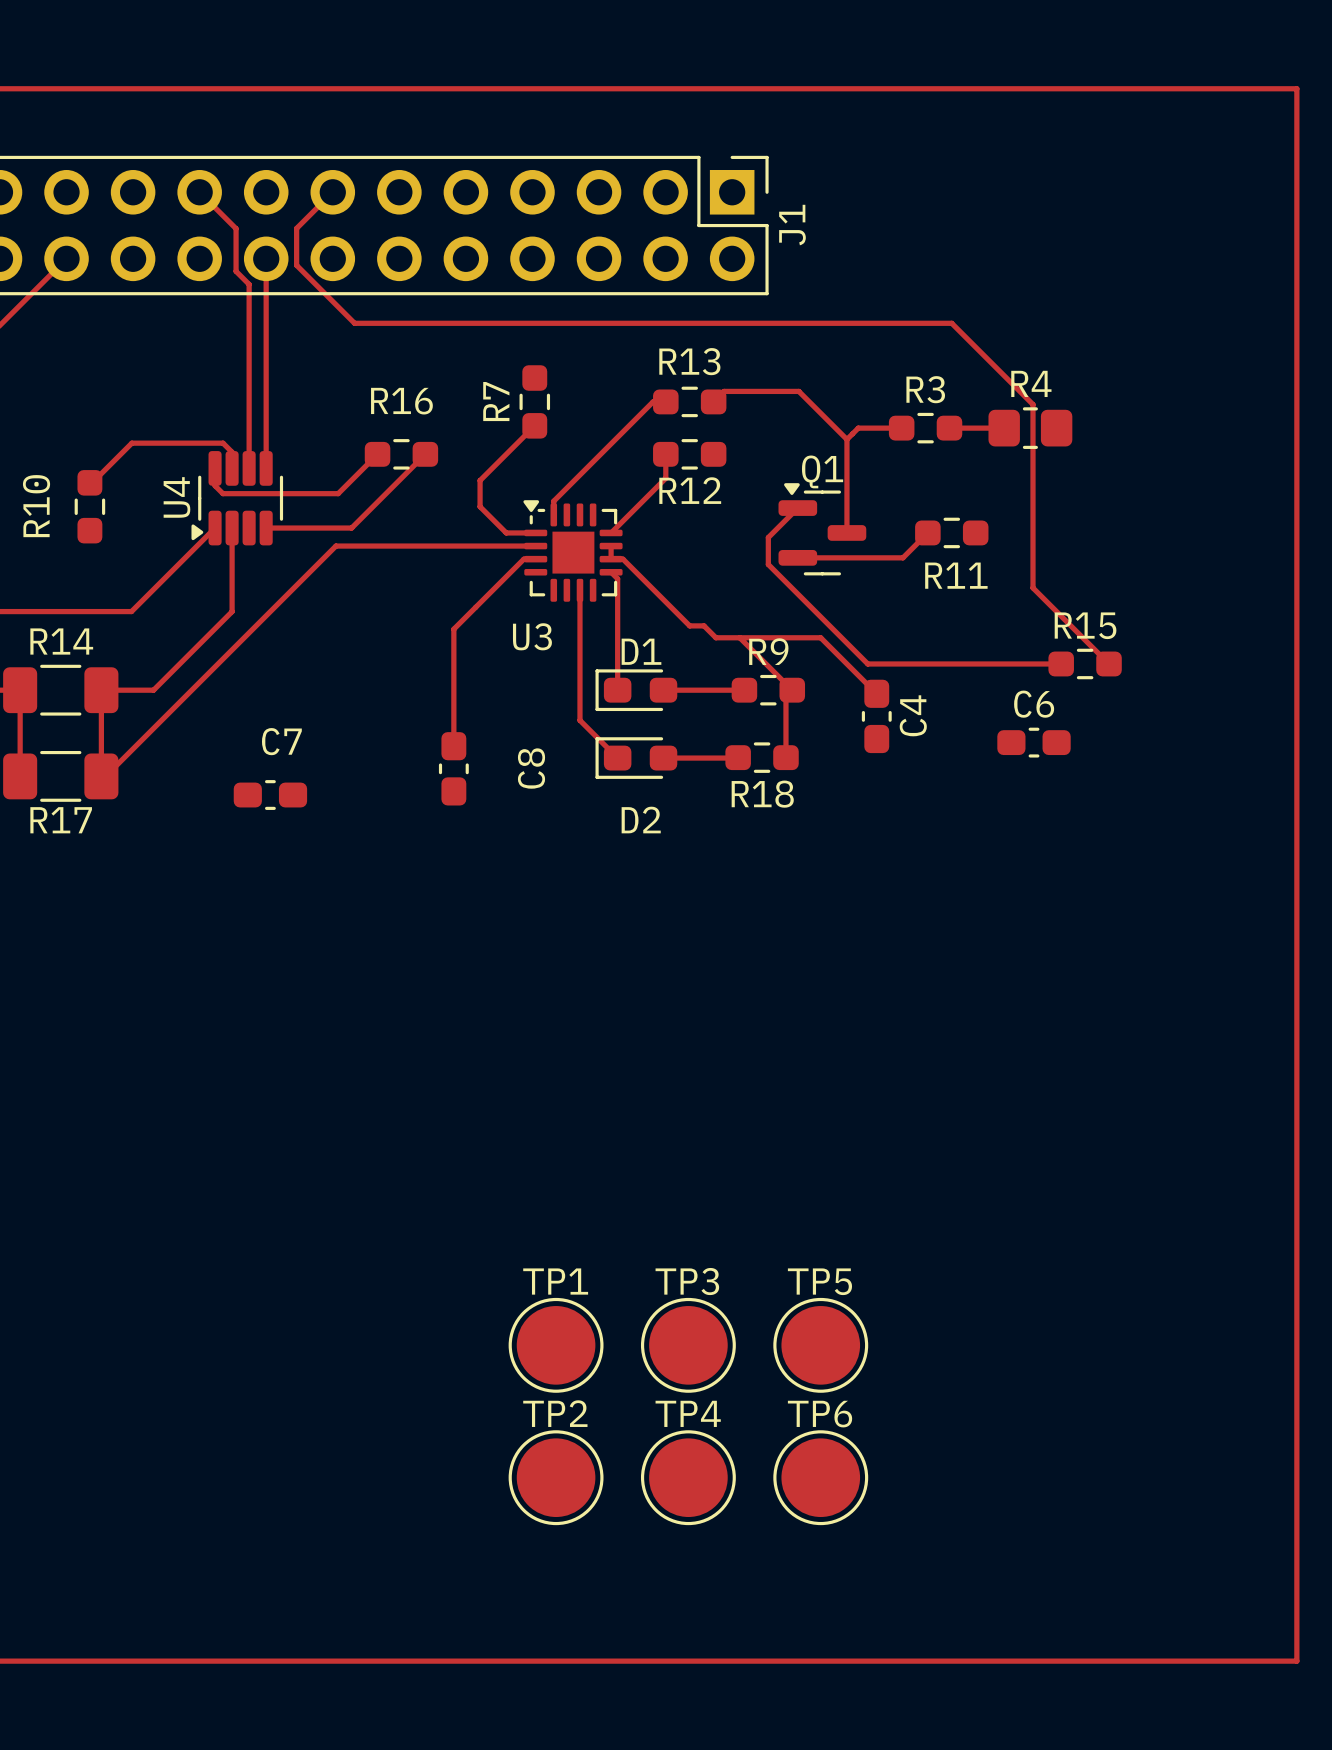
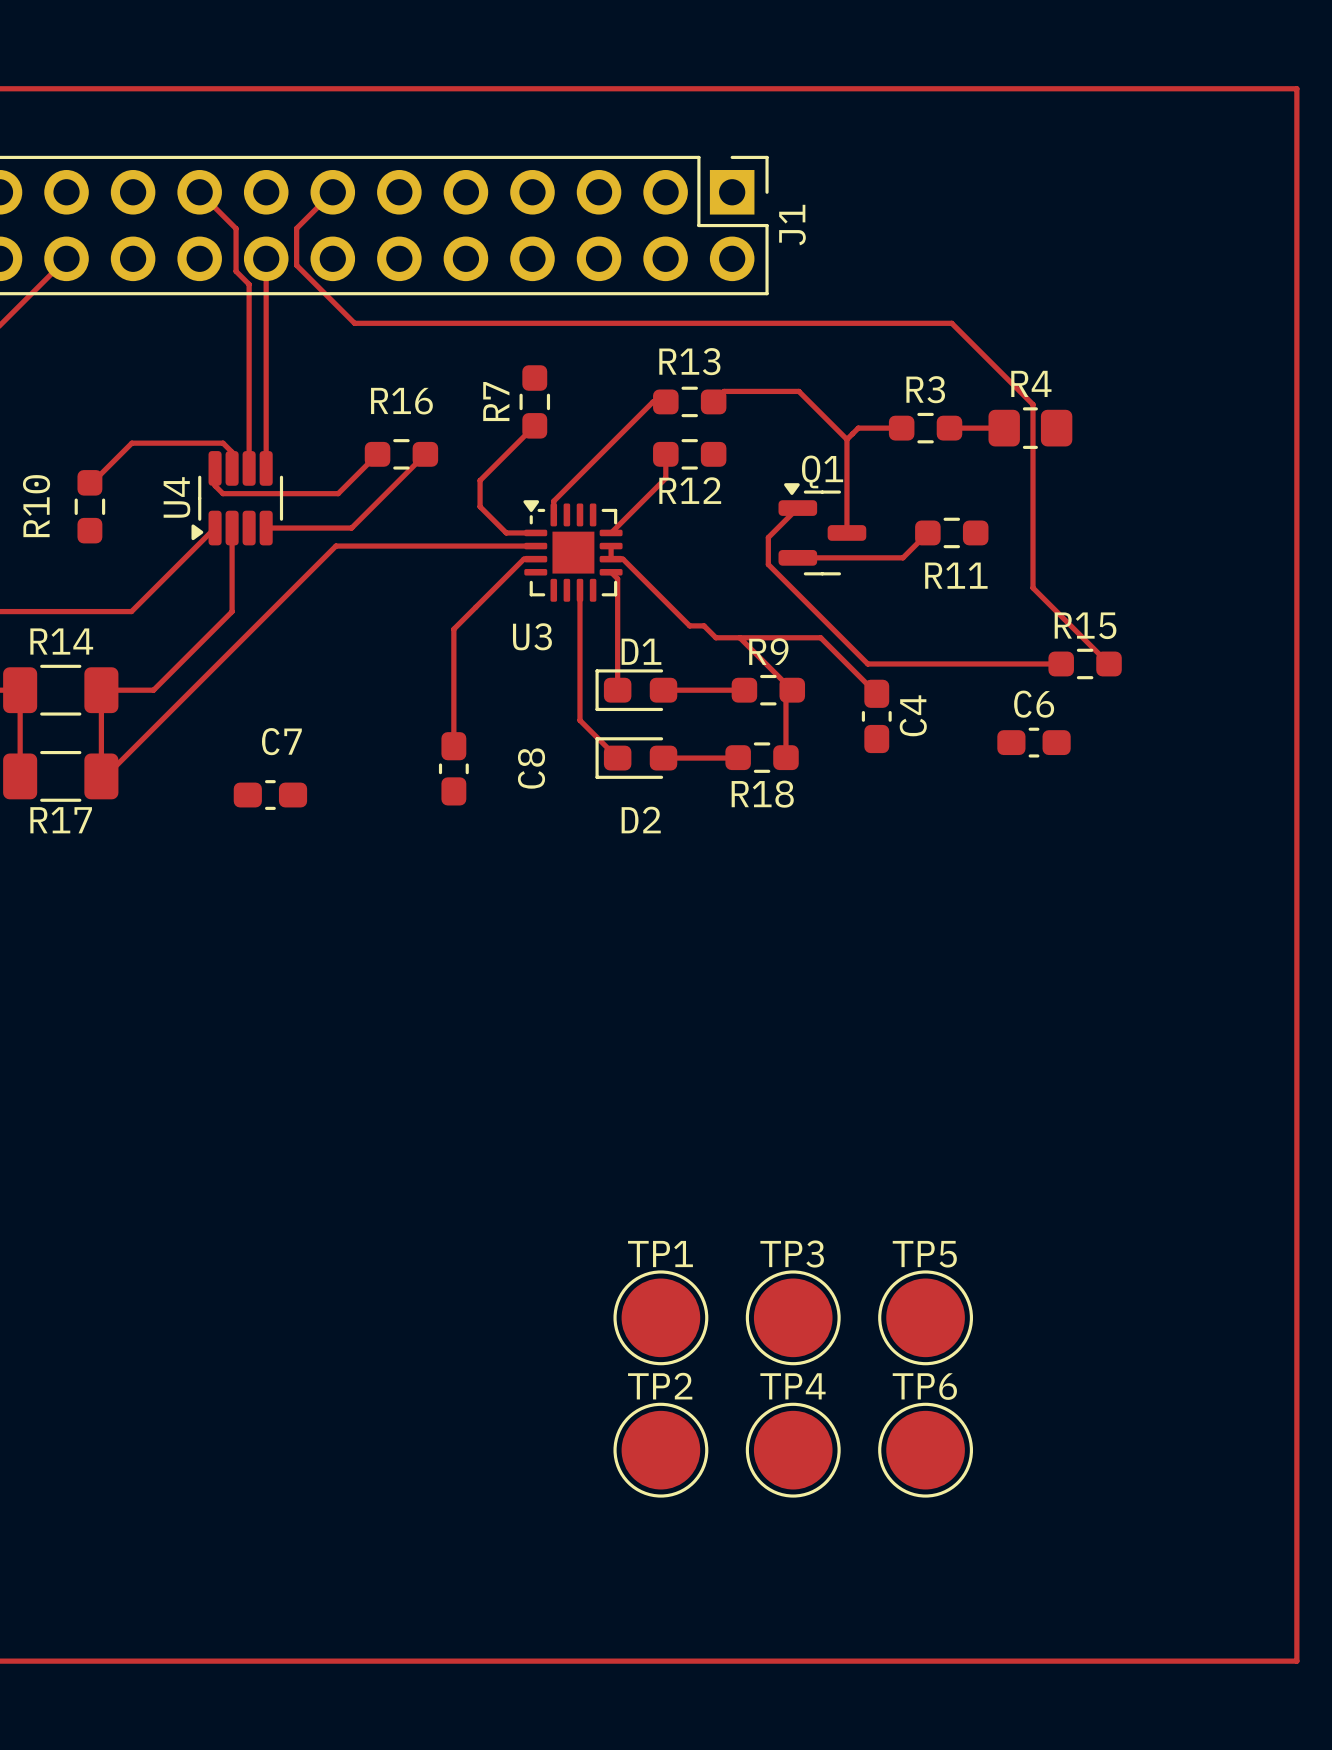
TP1 position: (556, 1345) -> (660, 1317)
TP3 position: (688, 1345) -> (793, 1317)
TP5 position: (820, 1345) -> (925, 1317)
TP2 position: (556, 1477) -> (660, 1450)
TP4 position: (688, 1477) -> (793, 1450)
TP6 position: (820, 1477) -> (925, 1450)

